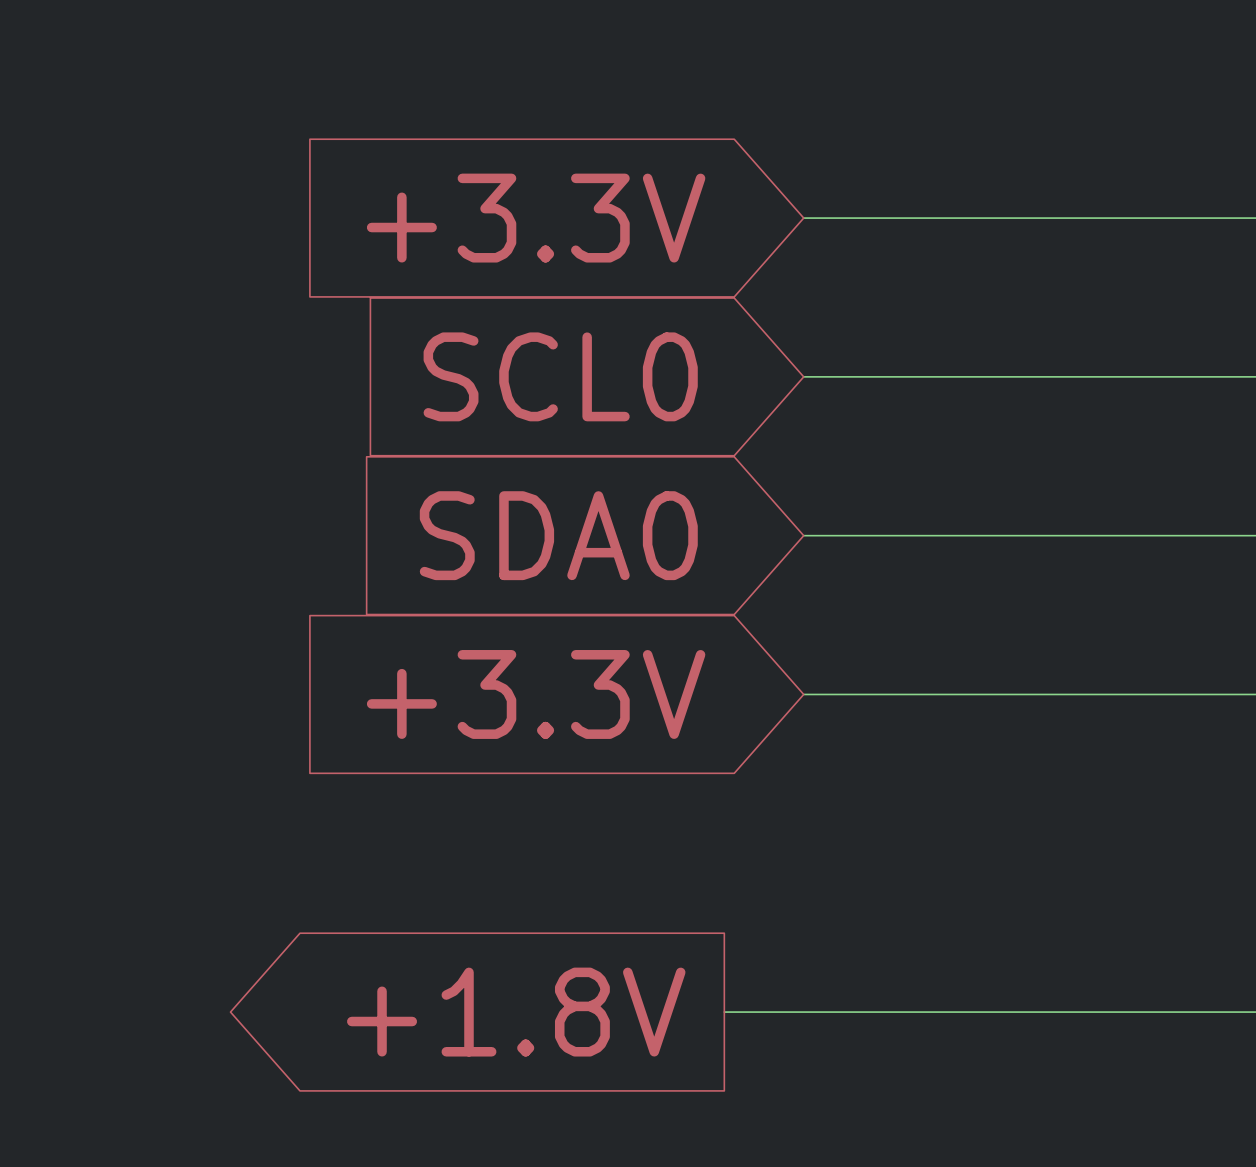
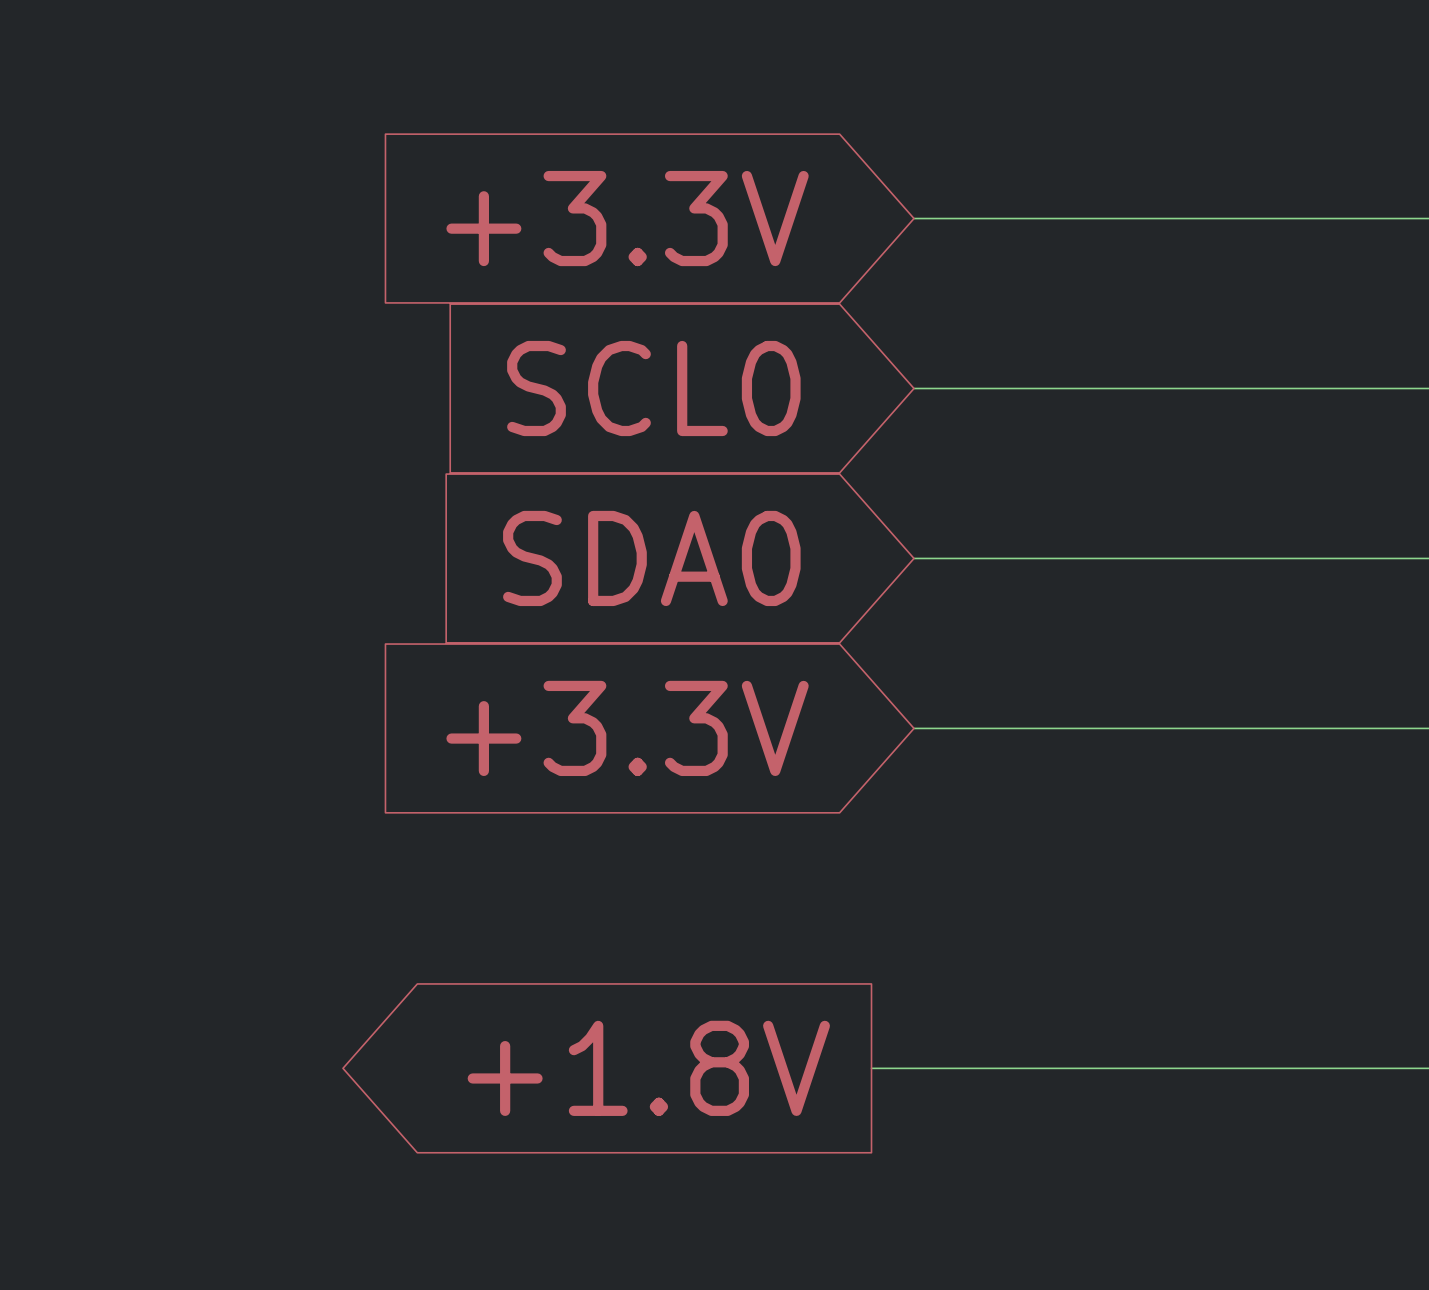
global label position: +1.8V (516, 1012) -> +1.8V (648, 1068)
wire: (724, 1012) (764, 1012) -> none

